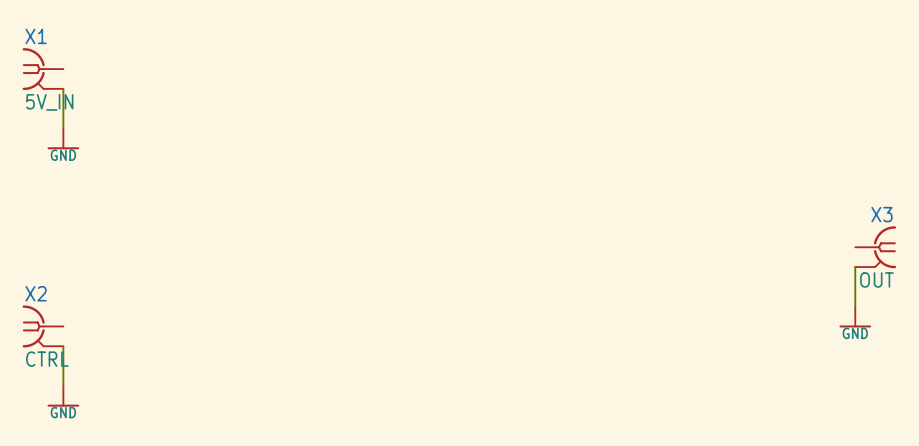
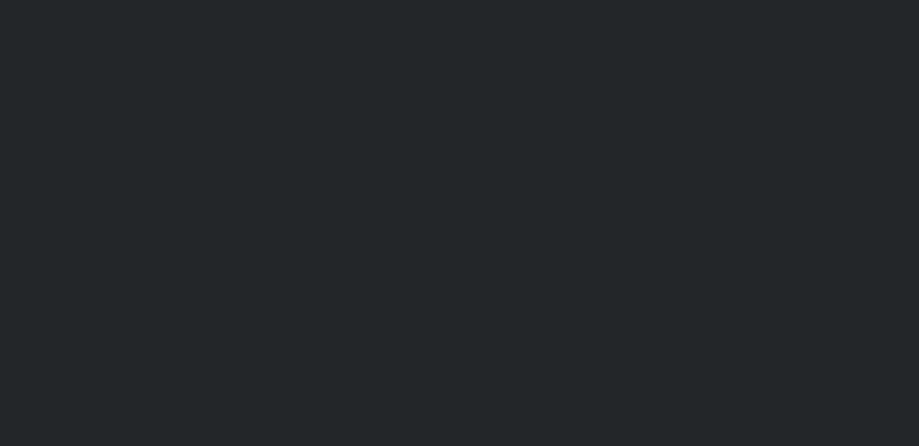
X1: 5V_IN (42, 69) -> none
wire: (63, 88) (63, 128) -> none
power symbol: GND (63, 138) -> none
X3: OUT (875, 247) -> none
wire: (855, 267) (855, 306) -> none
power symbol: GND (855, 317) -> none
X2: CTRL (42, 326) -> none
wire: (63, 346) (63, 385) -> none
power symbol: GND (63, 396) -> none

